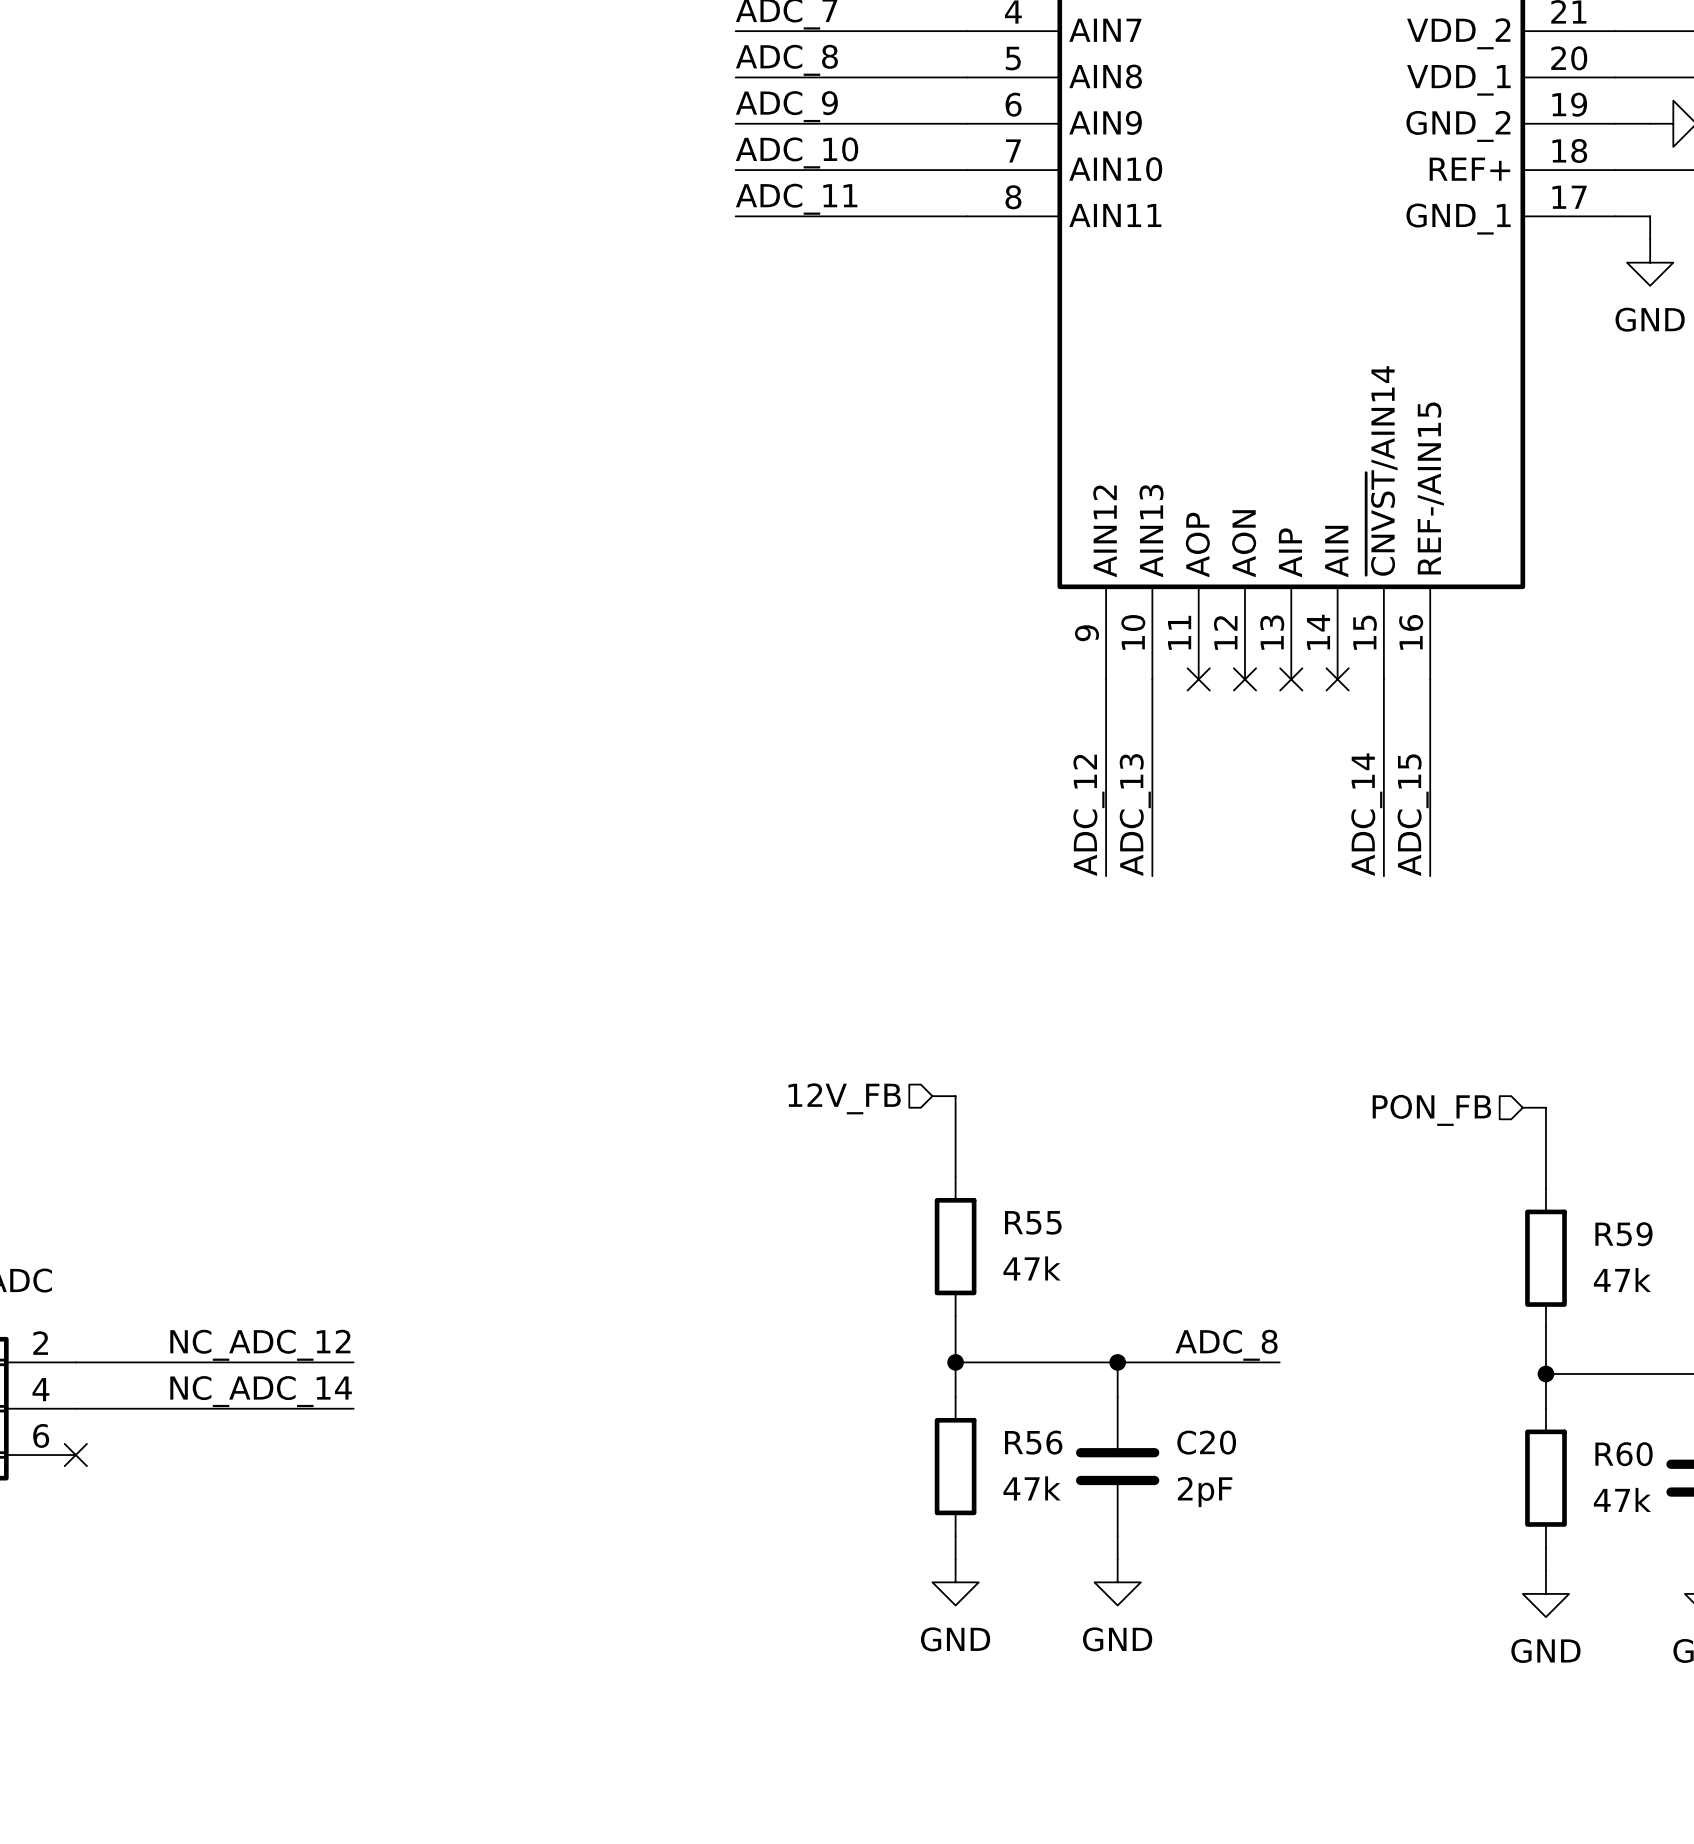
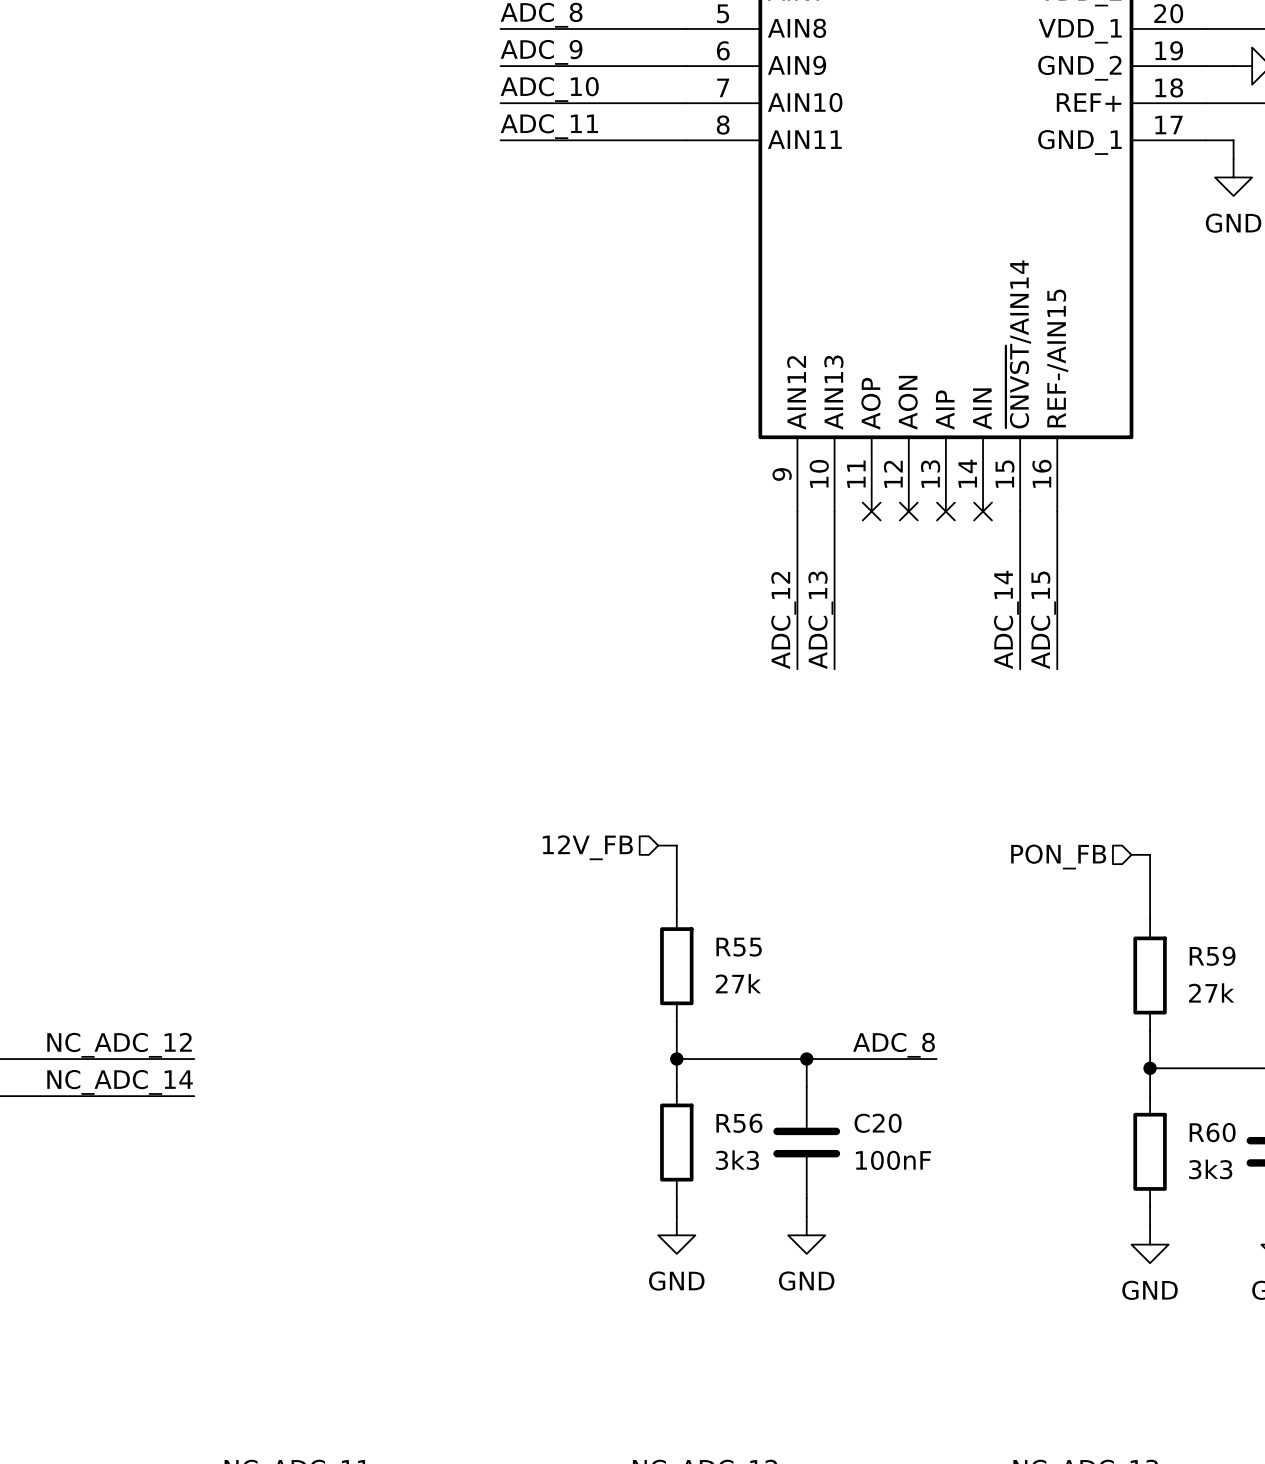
R55 value: 47k (1032, 1268) -> 27k (738, 983)
R59 value: 47k (1622, 1280) -> 27k (1211, 992)
R56 value: 47k (1032, 1488) -> 3k3 (737, 1160)
C20 value: 2pF (1205, 1491) -> 100nF (893, 1160)
R60 value: 47k (1622, 1499) -> 3k3 (1210, 1169)

